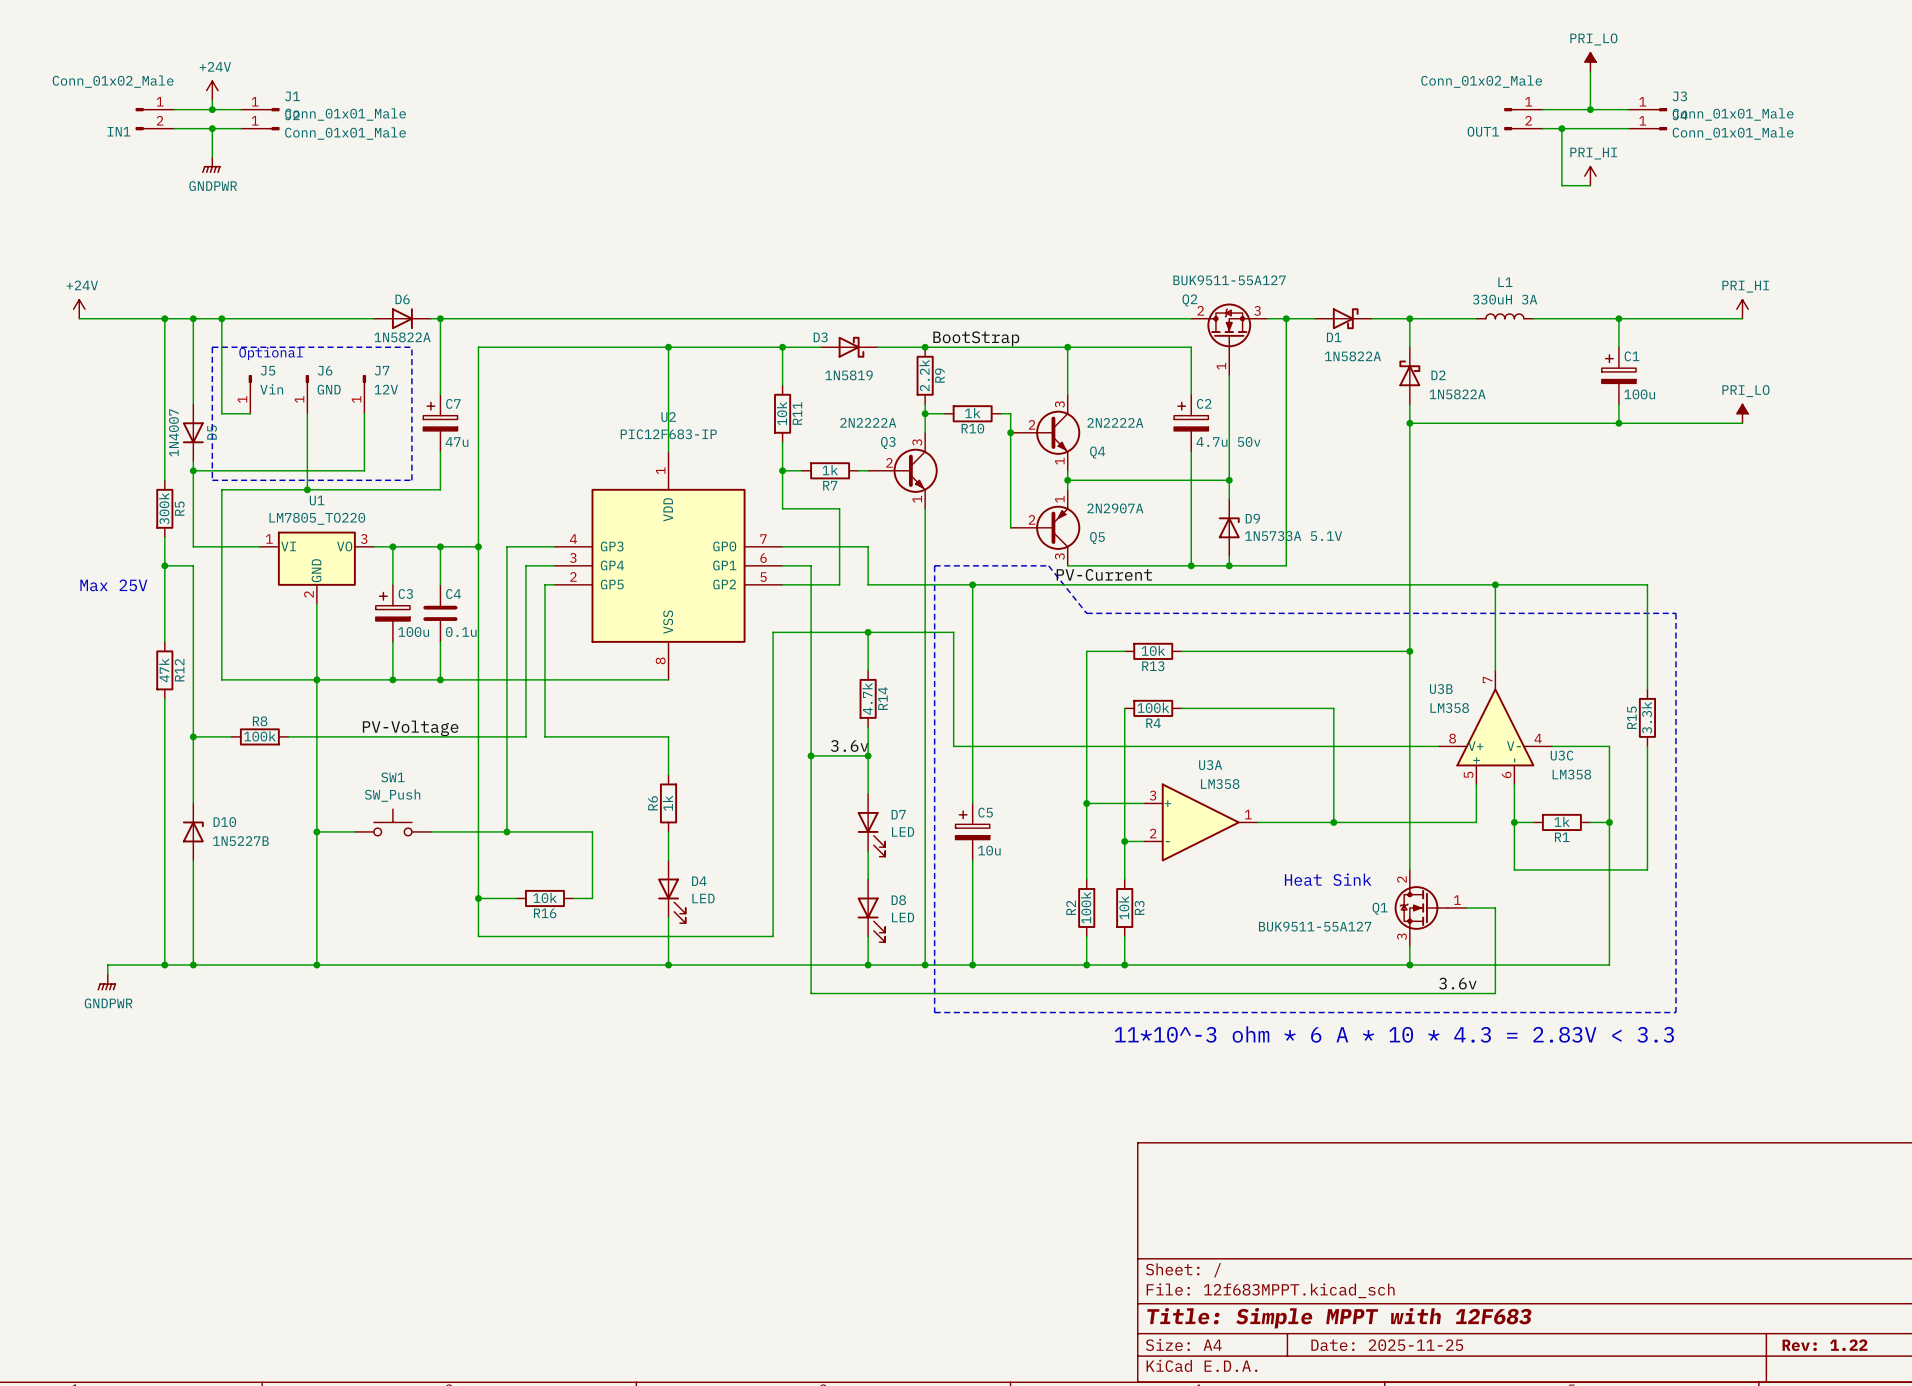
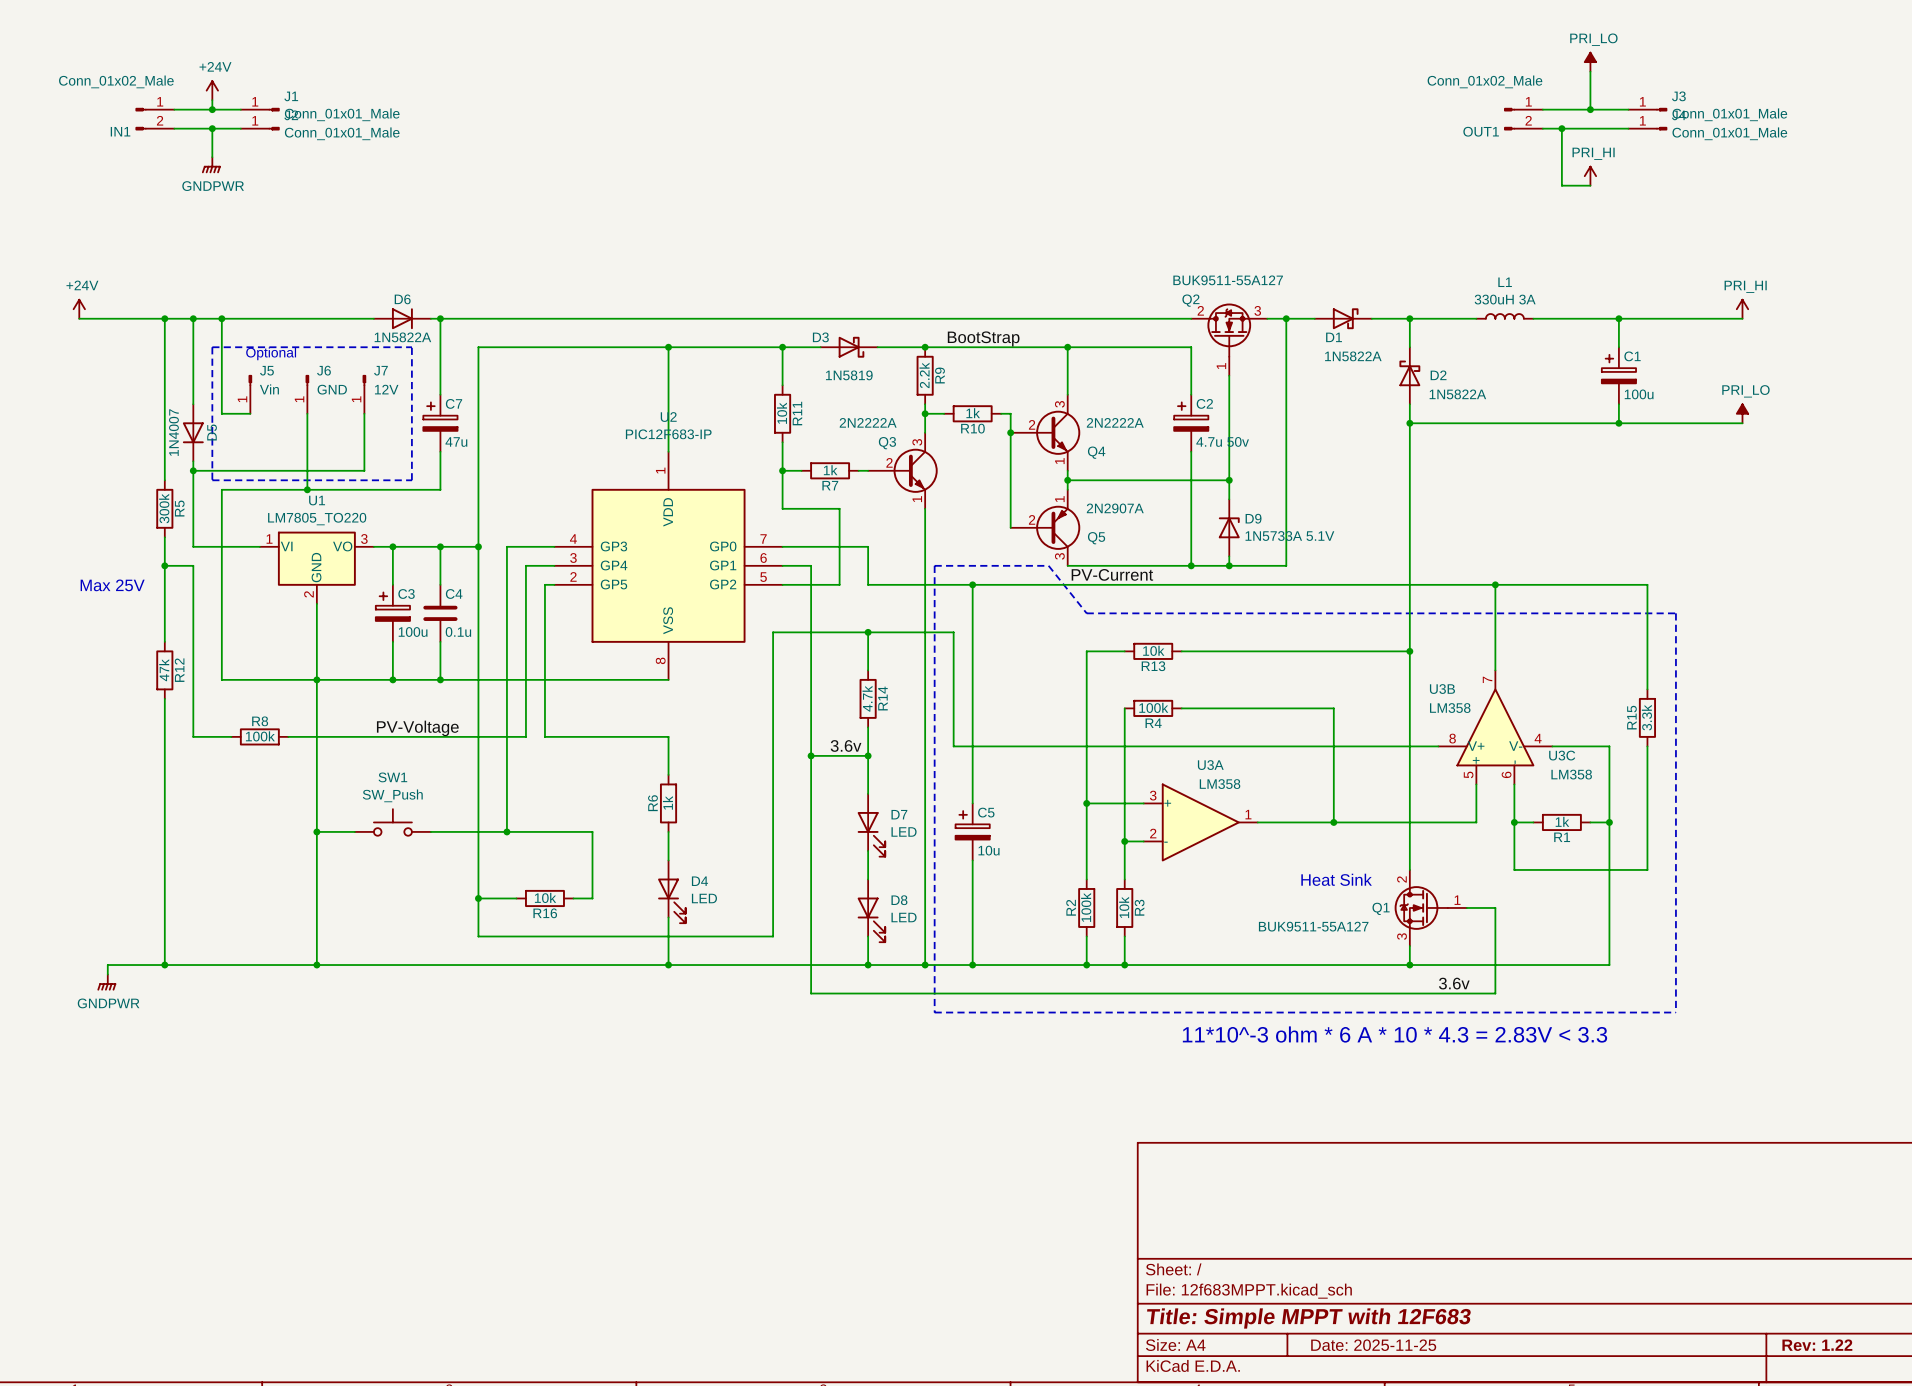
wire: (193, 736) (193, 803) -> none
junction: (193, 736) -> none
D10: 1N5227B (193, 831) -> none
wire: (193, 860) (193, 965) -> none
junction: (193, 965) -> none

